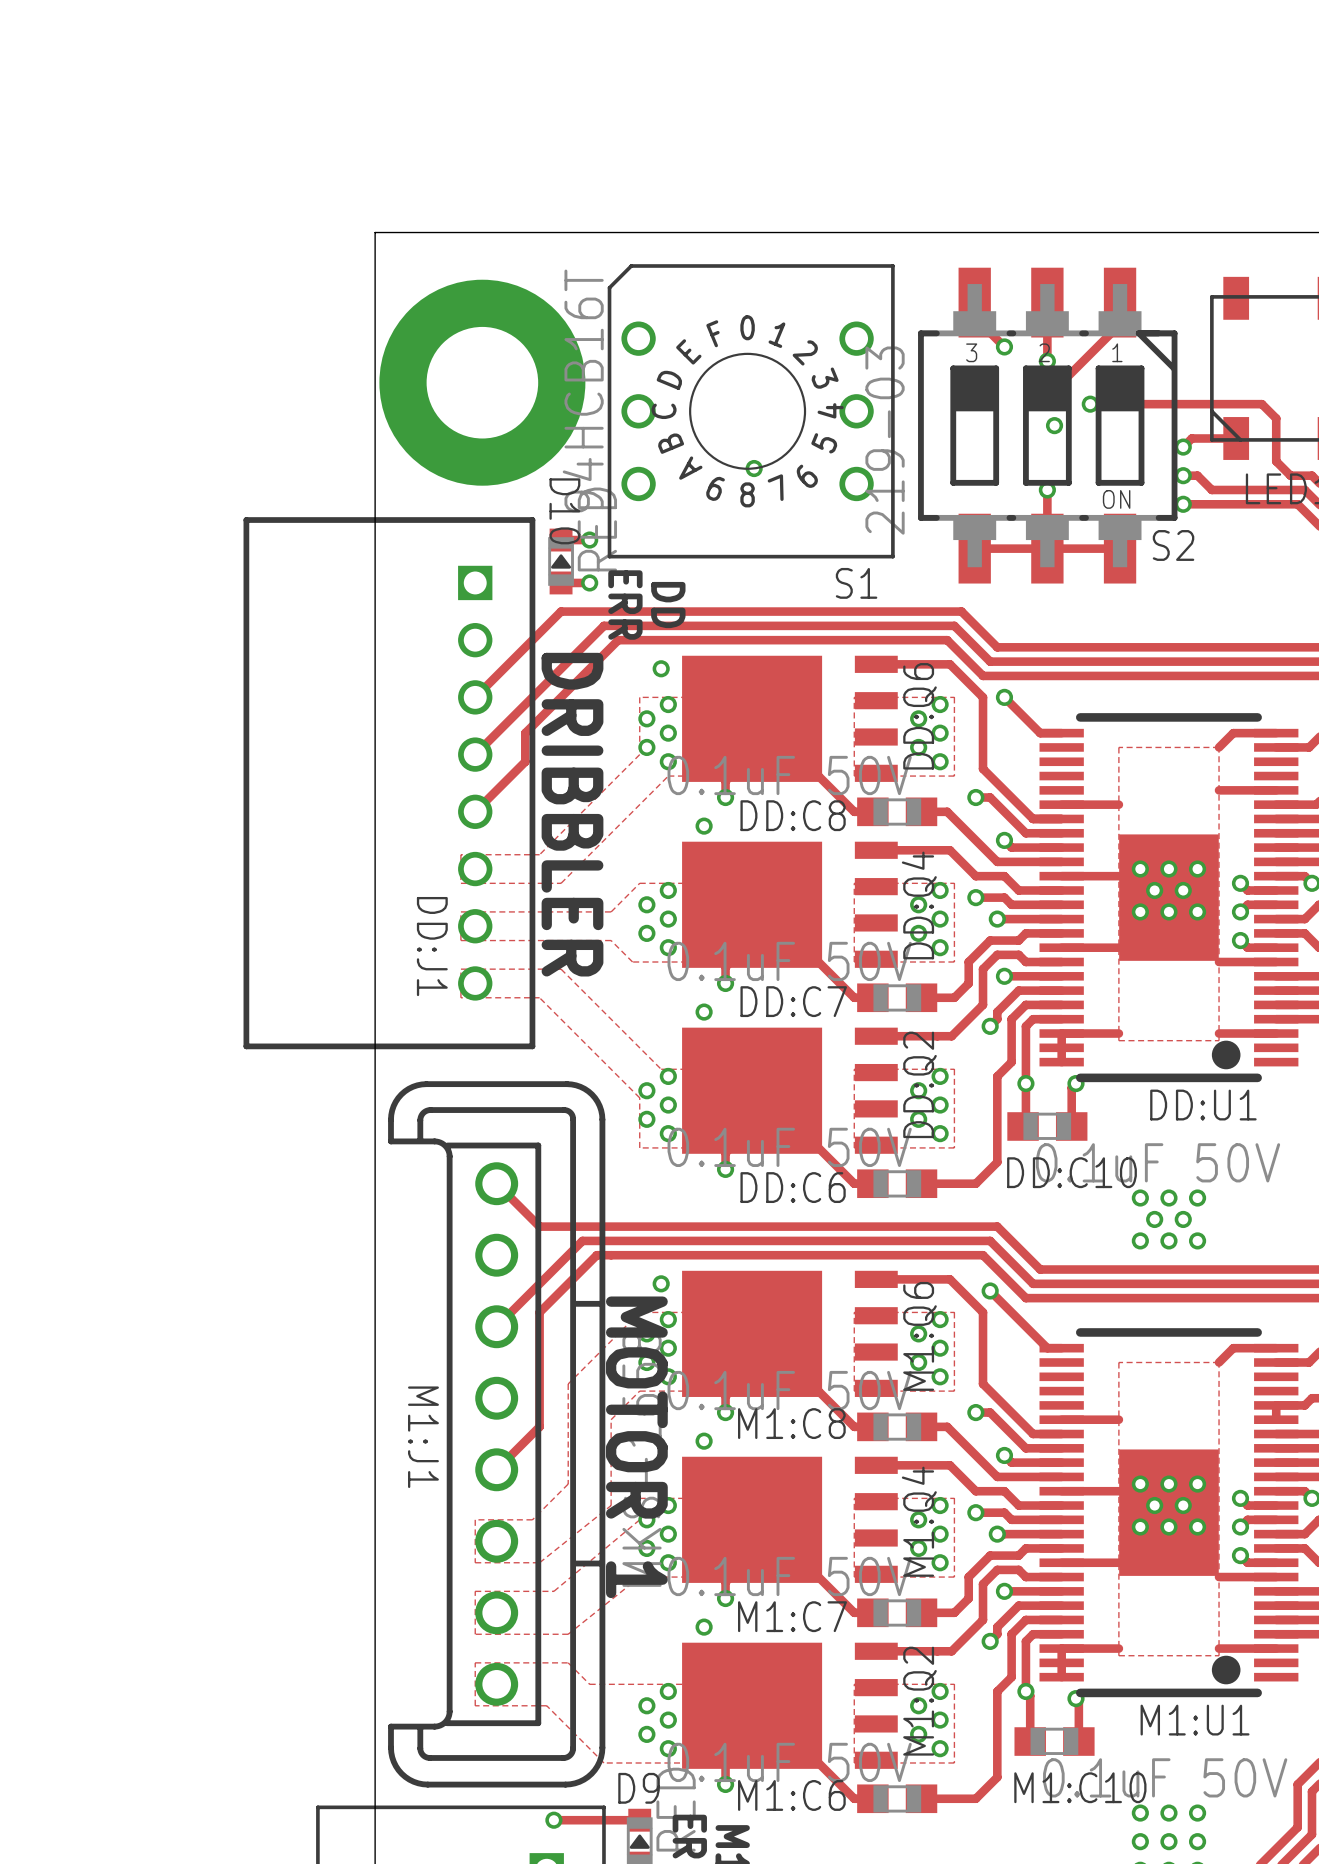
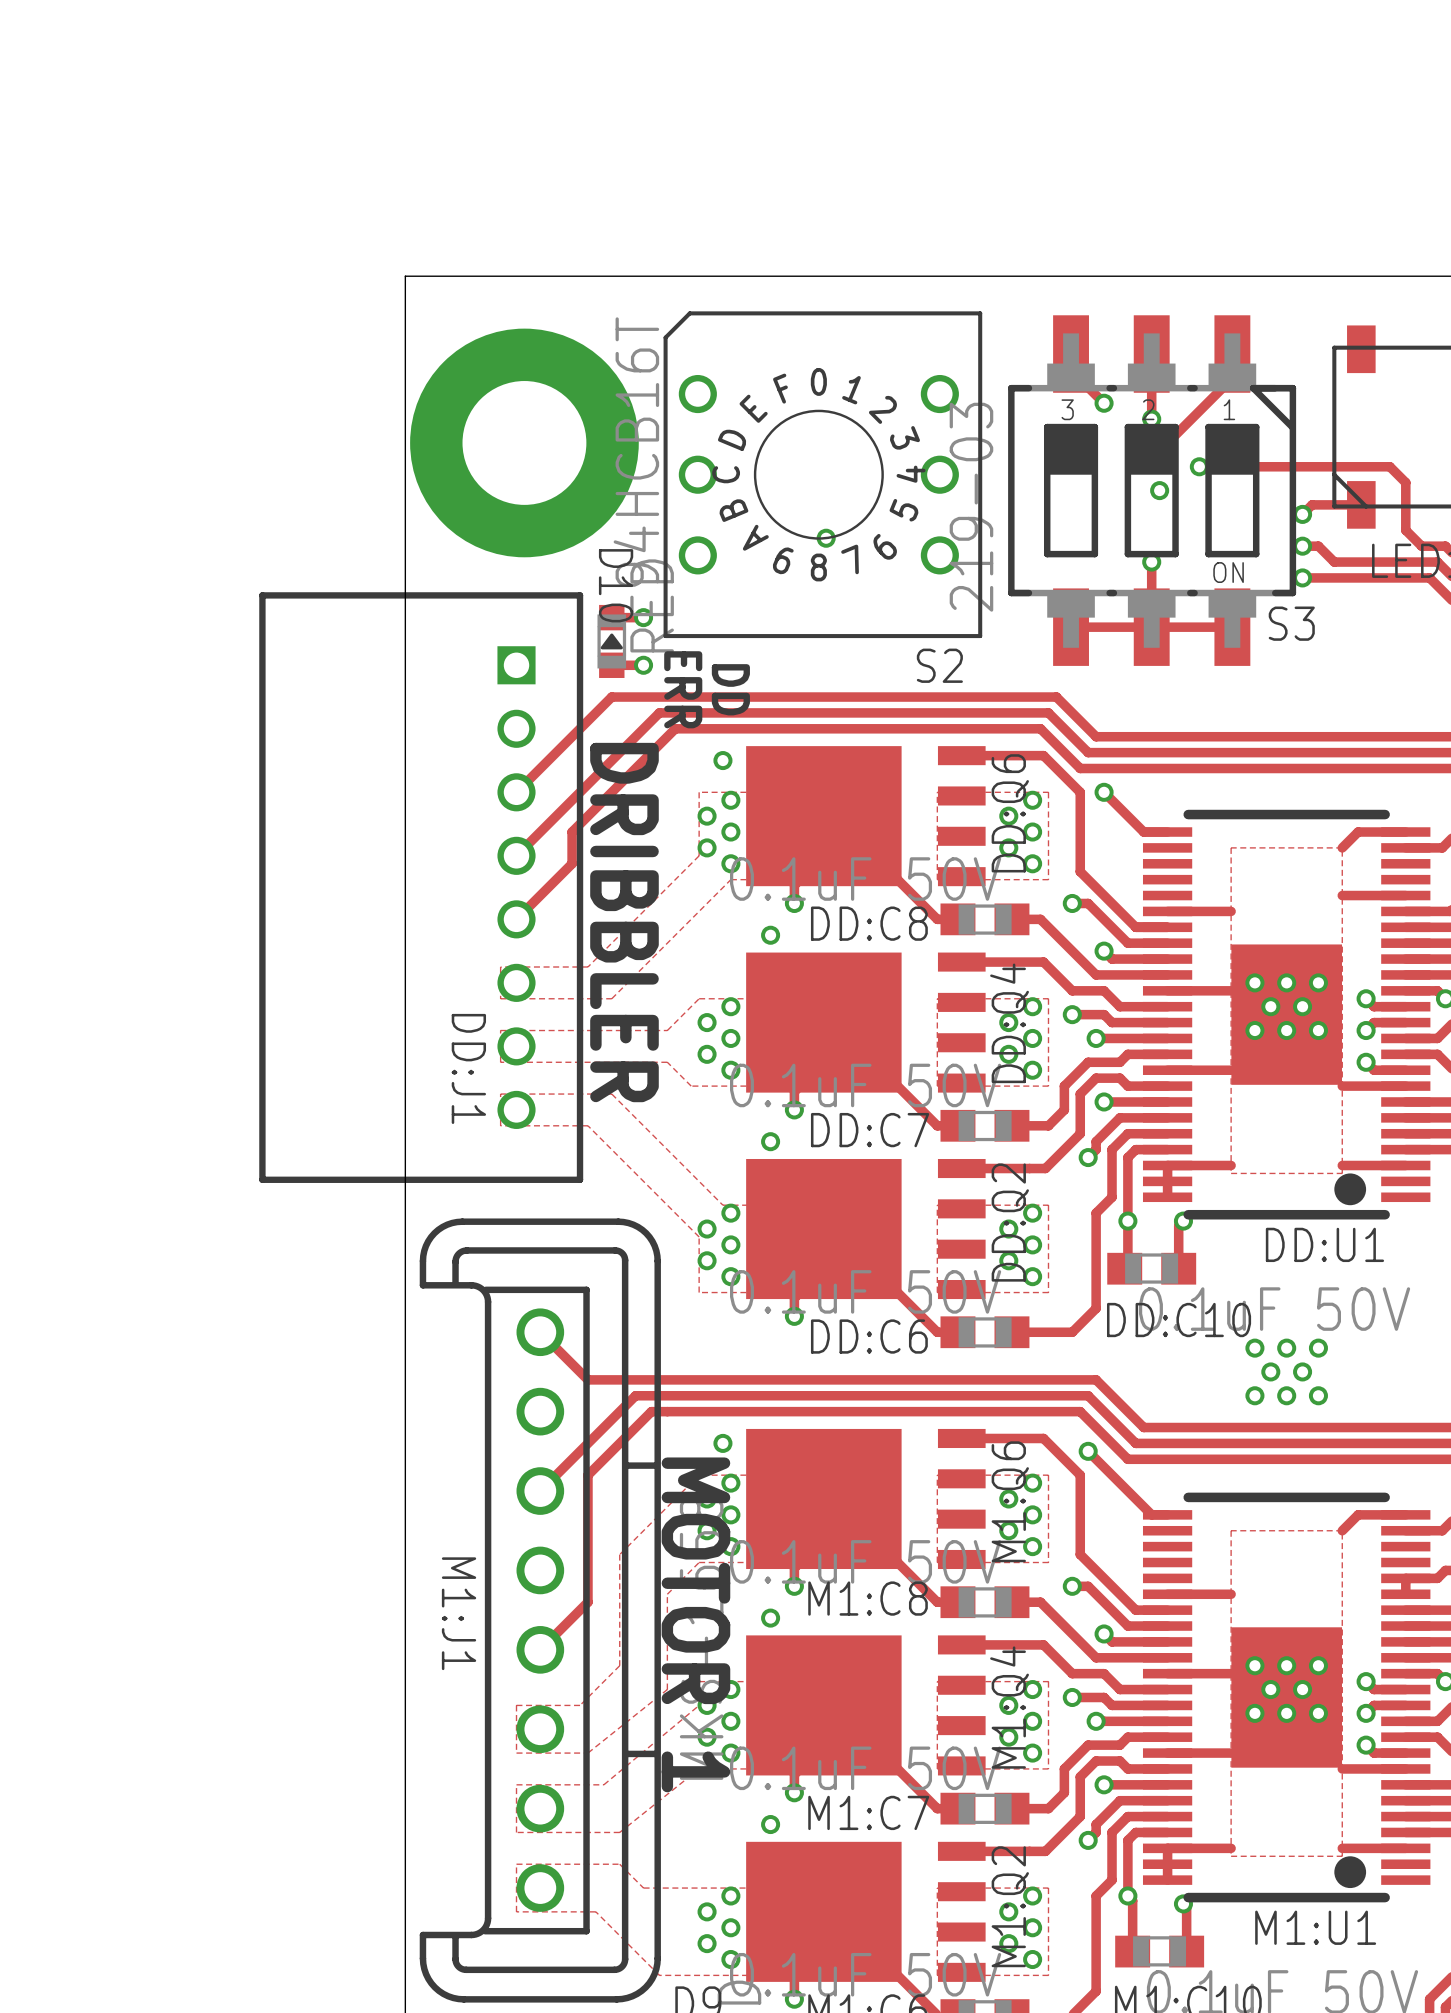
S2 name: S2 (1173, 545) -> S3 (1291, 623)
S1 name: S1 (856, 583) -> S2 (939, 665)

